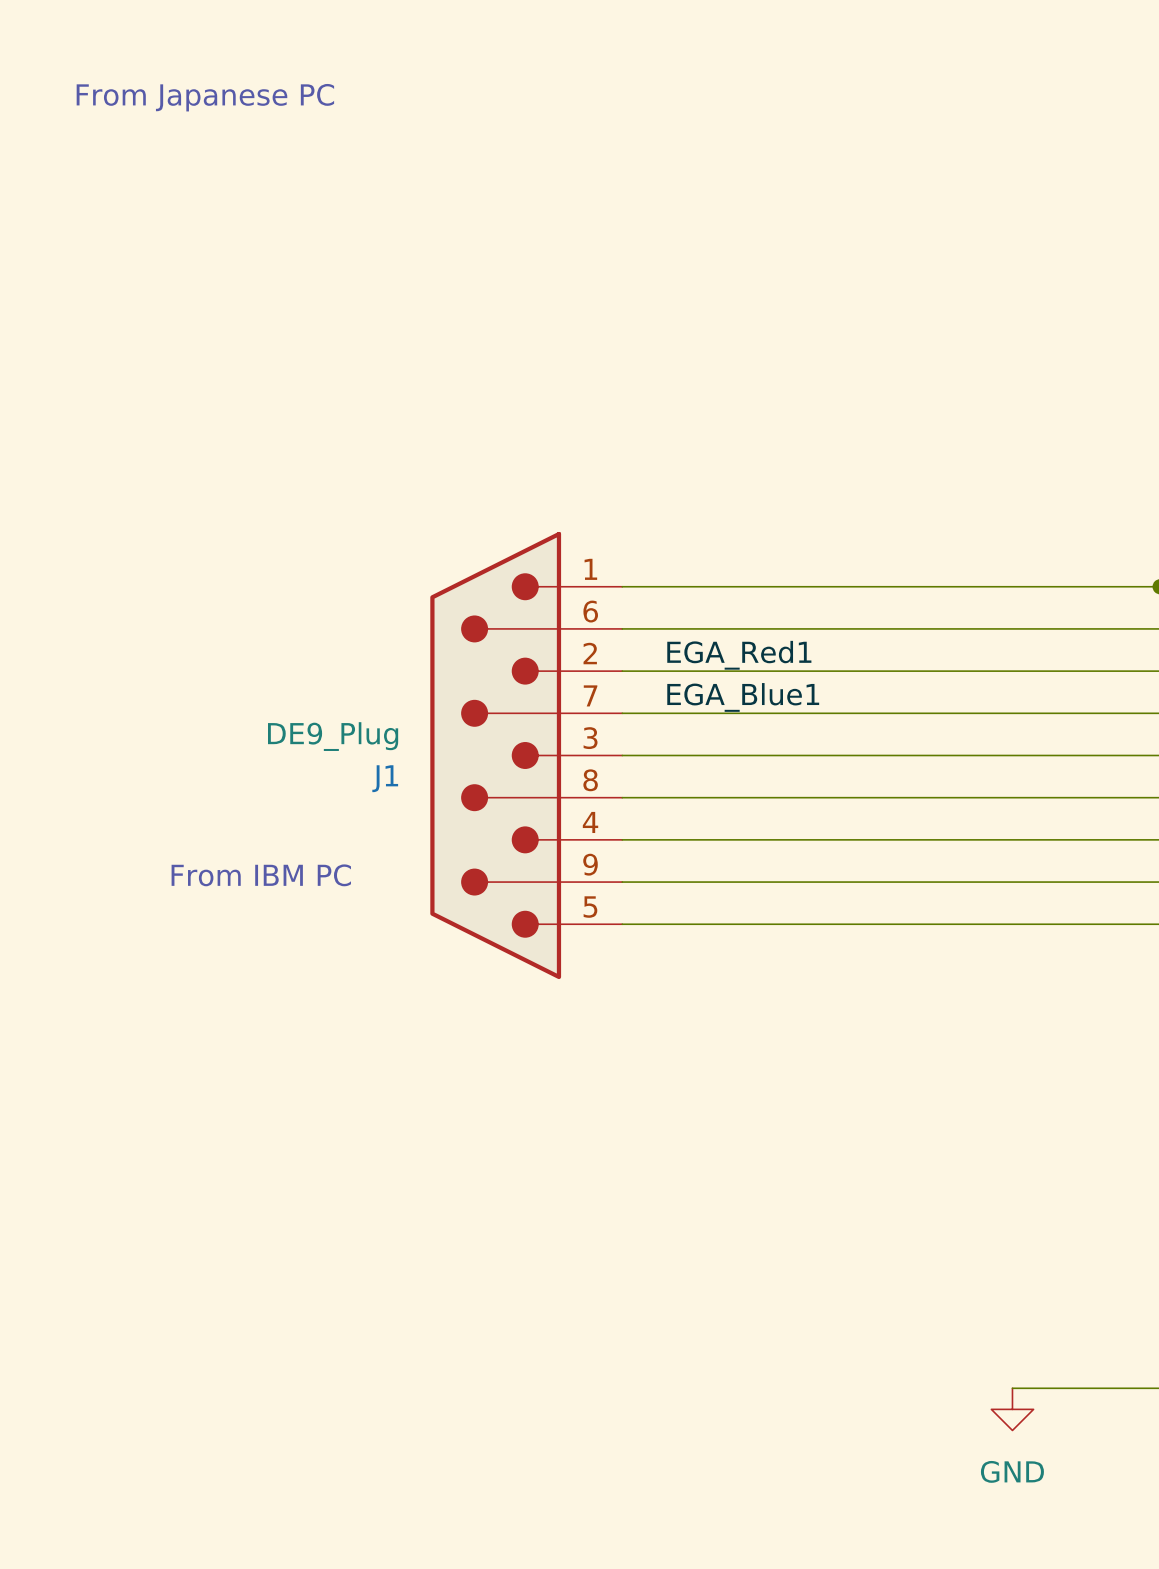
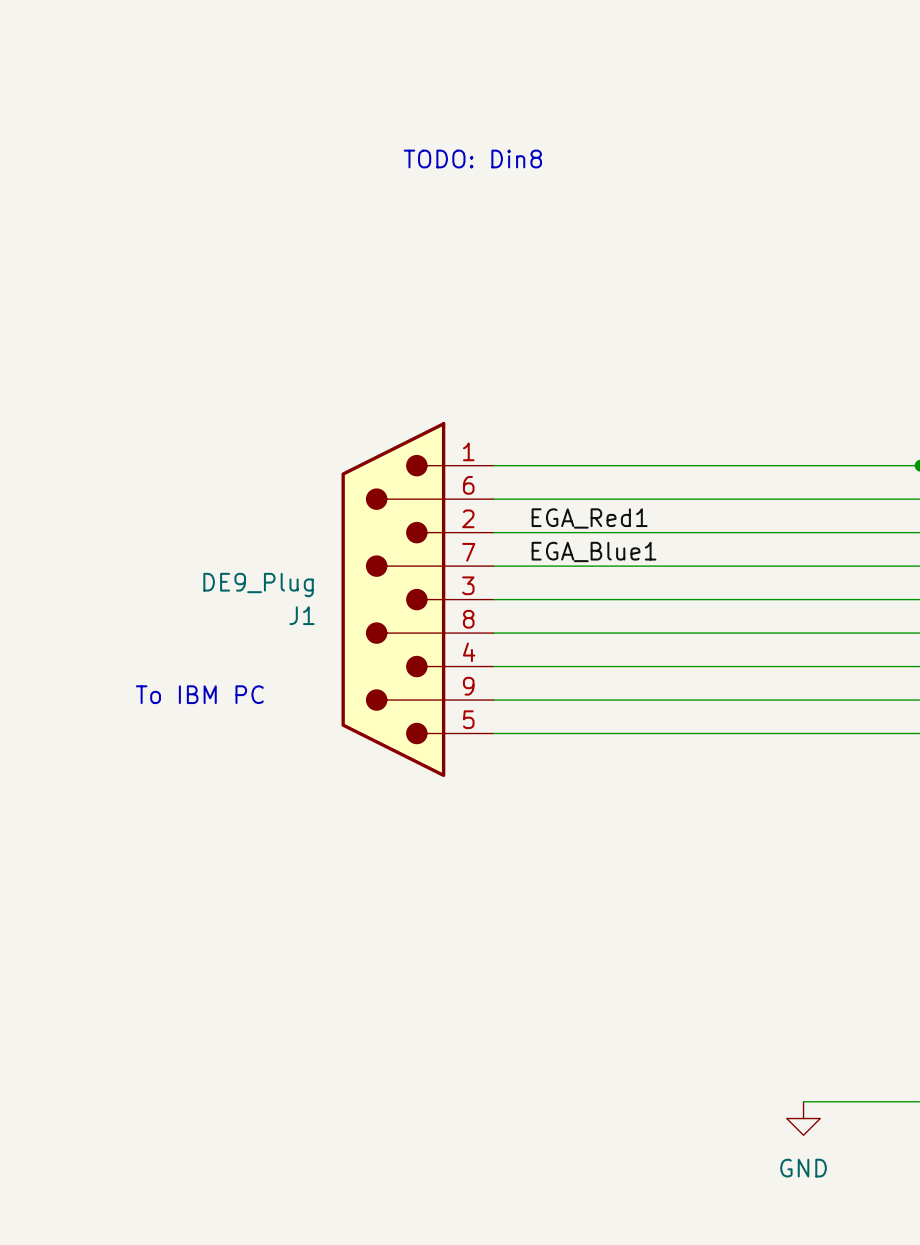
text: From Japanese PC (205, 97) -> none
text: none -> TODO: Din8 (472, 159)
text: From IBM PC (261, 875) -> To IBM PC (199, 694)

